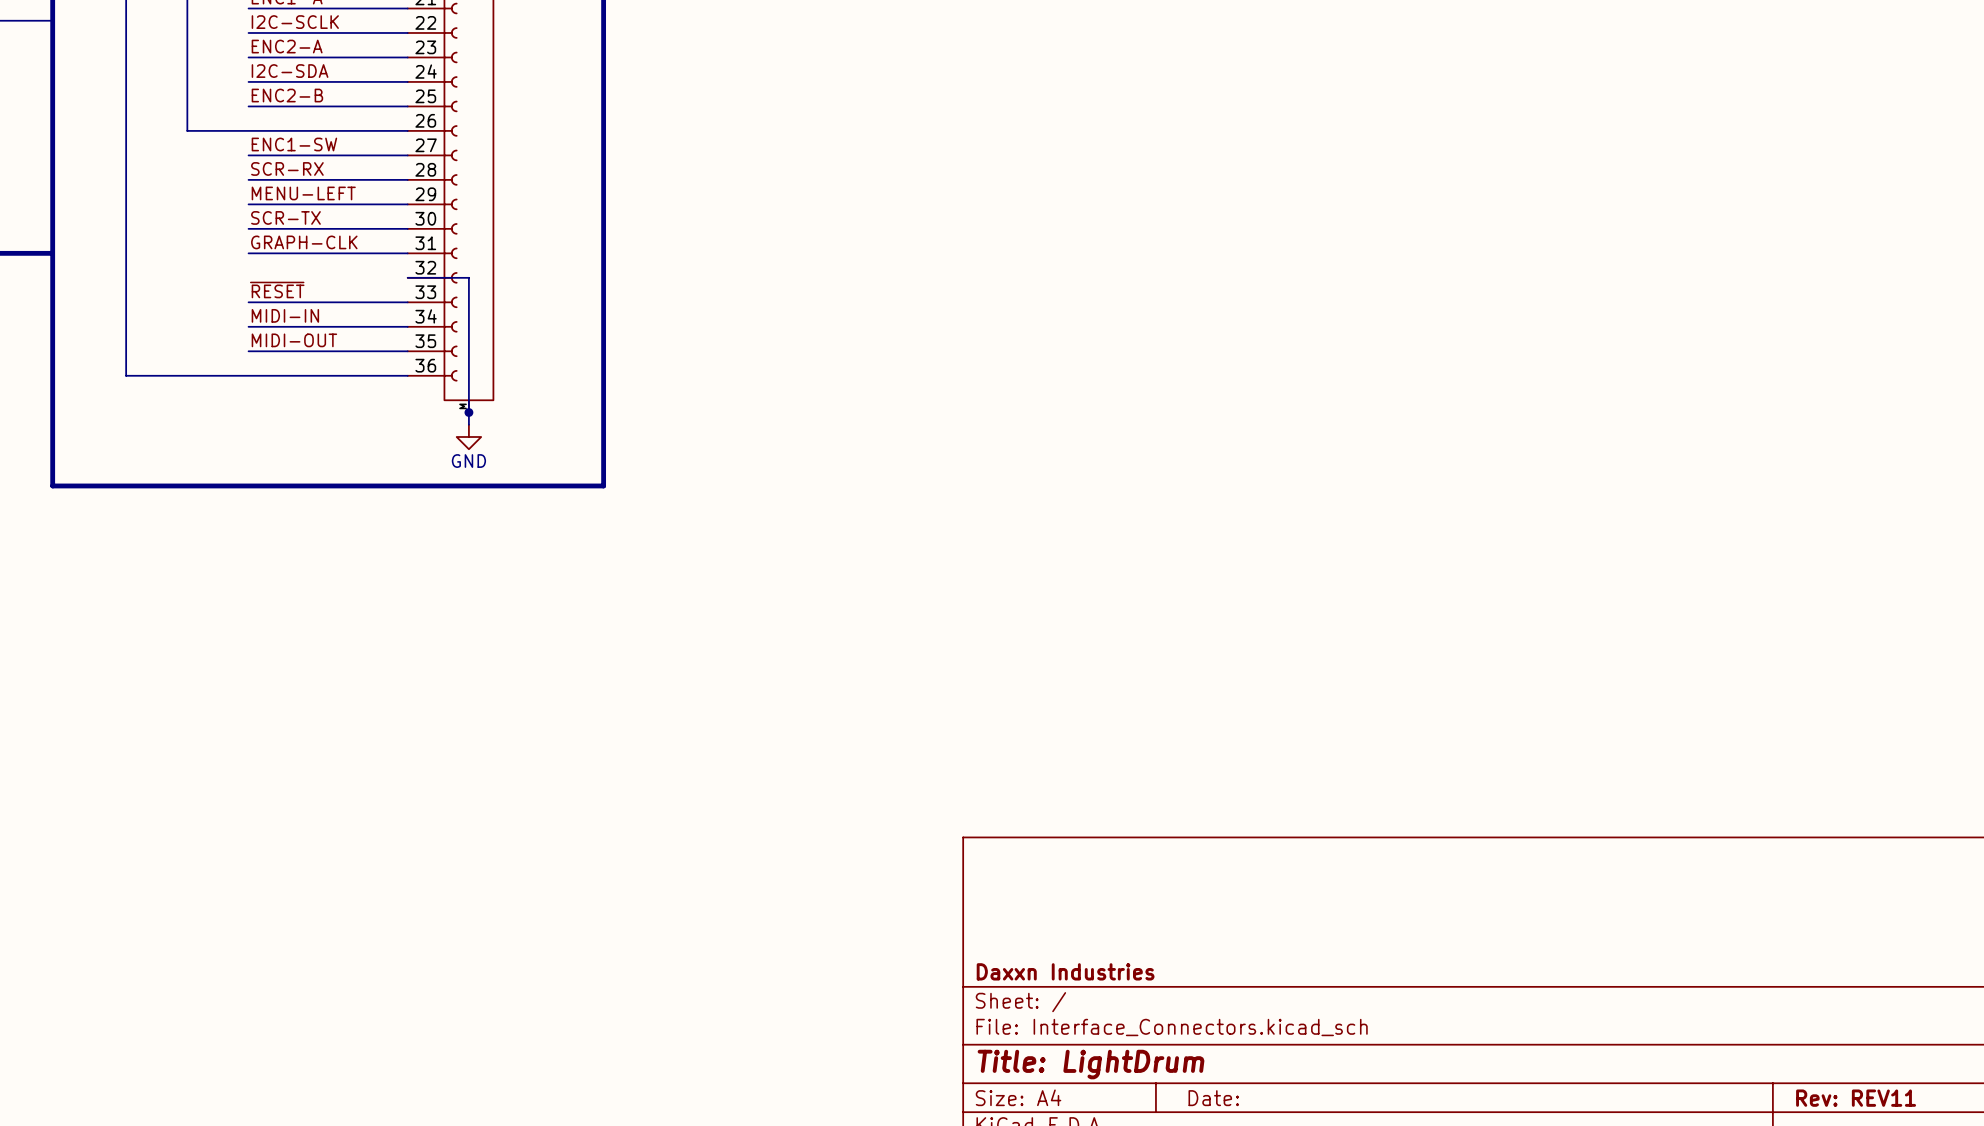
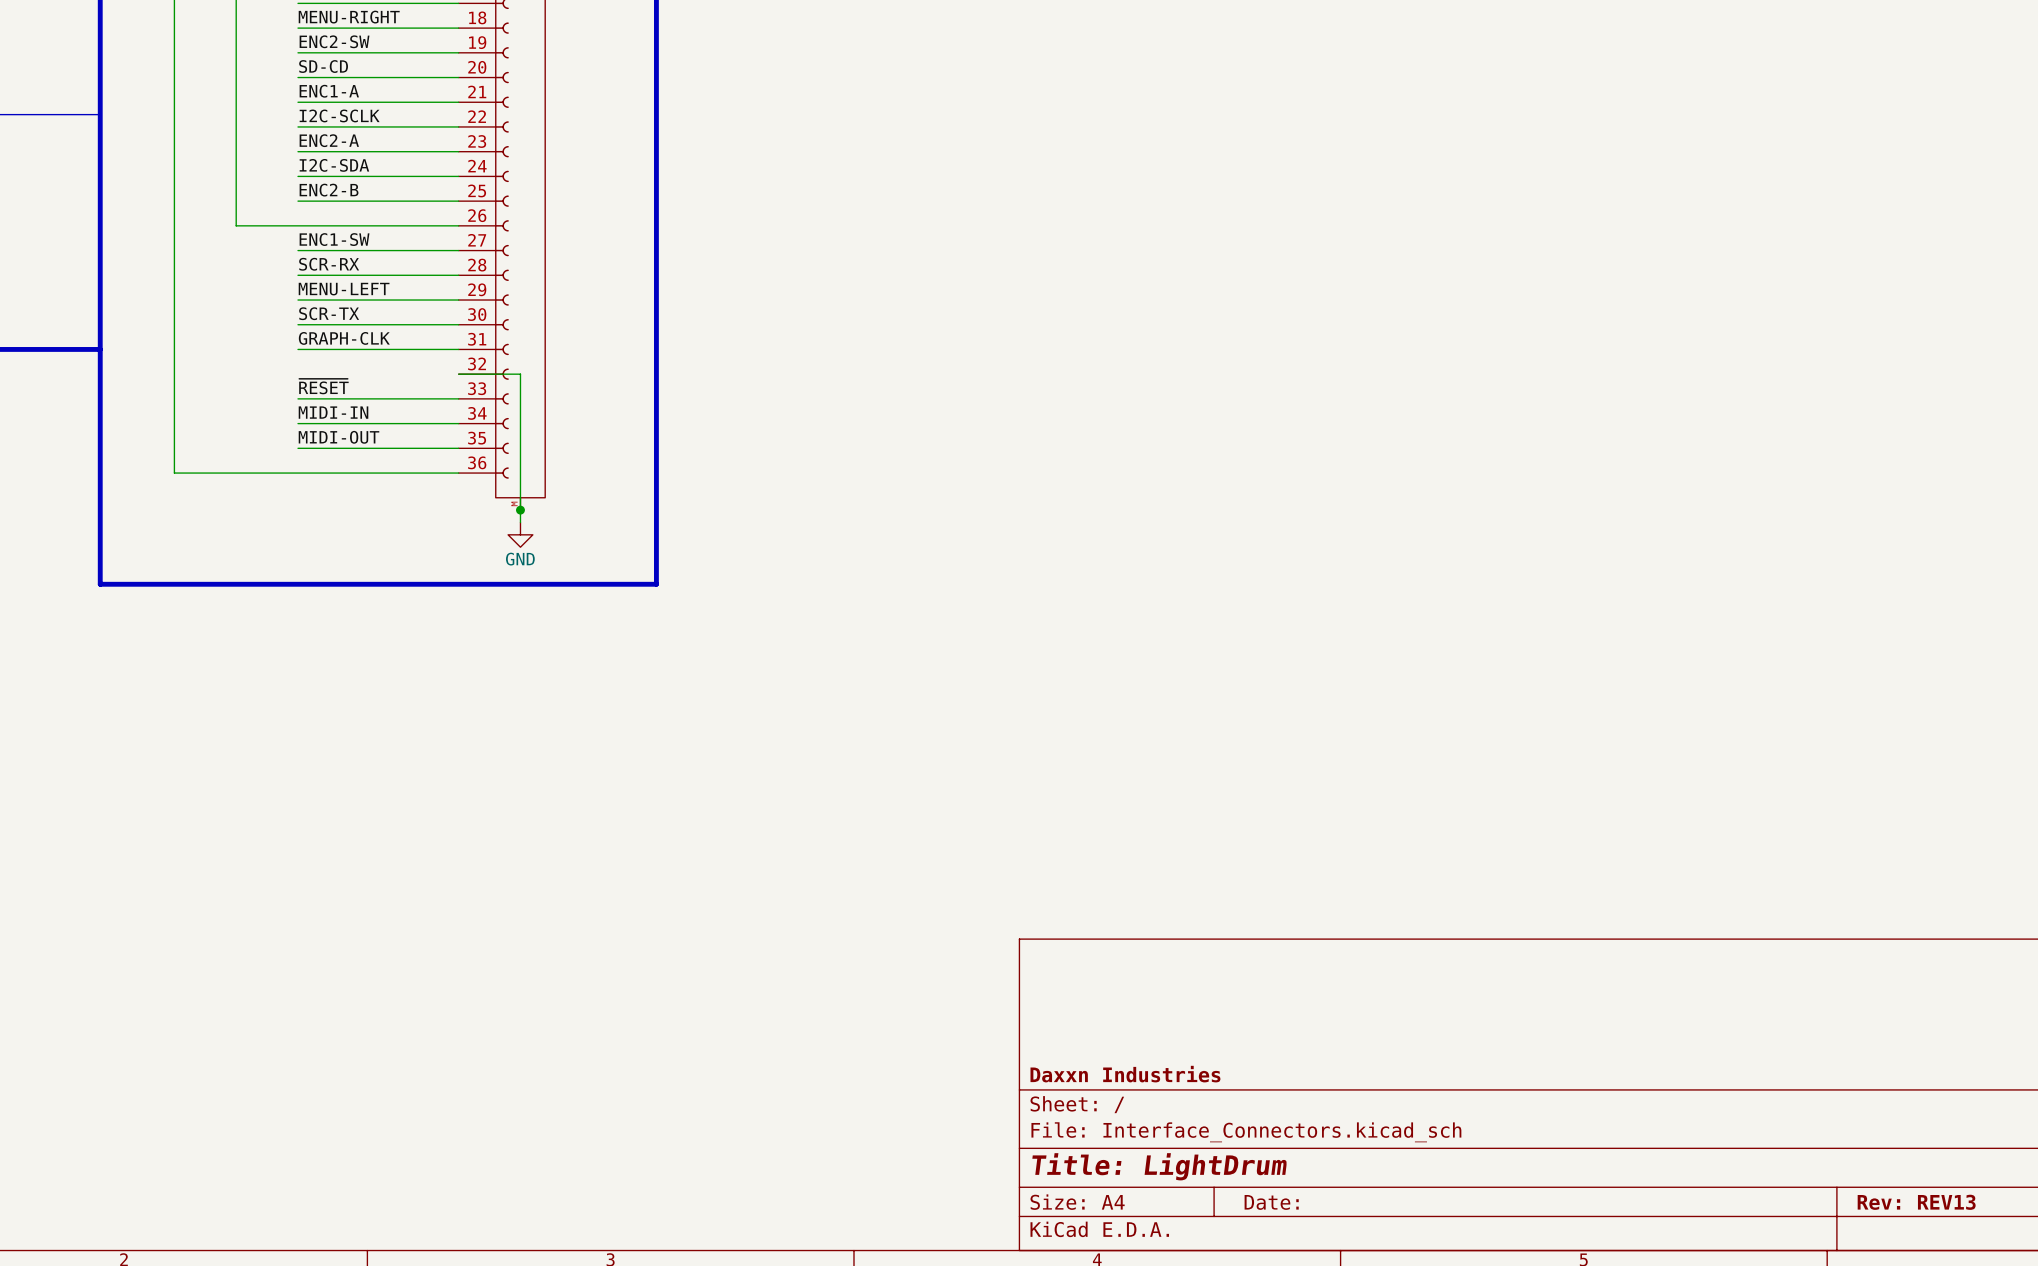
title block: Rev: REV11 (1856, 1098) -> Rev: REV13 (1916, 1202)

